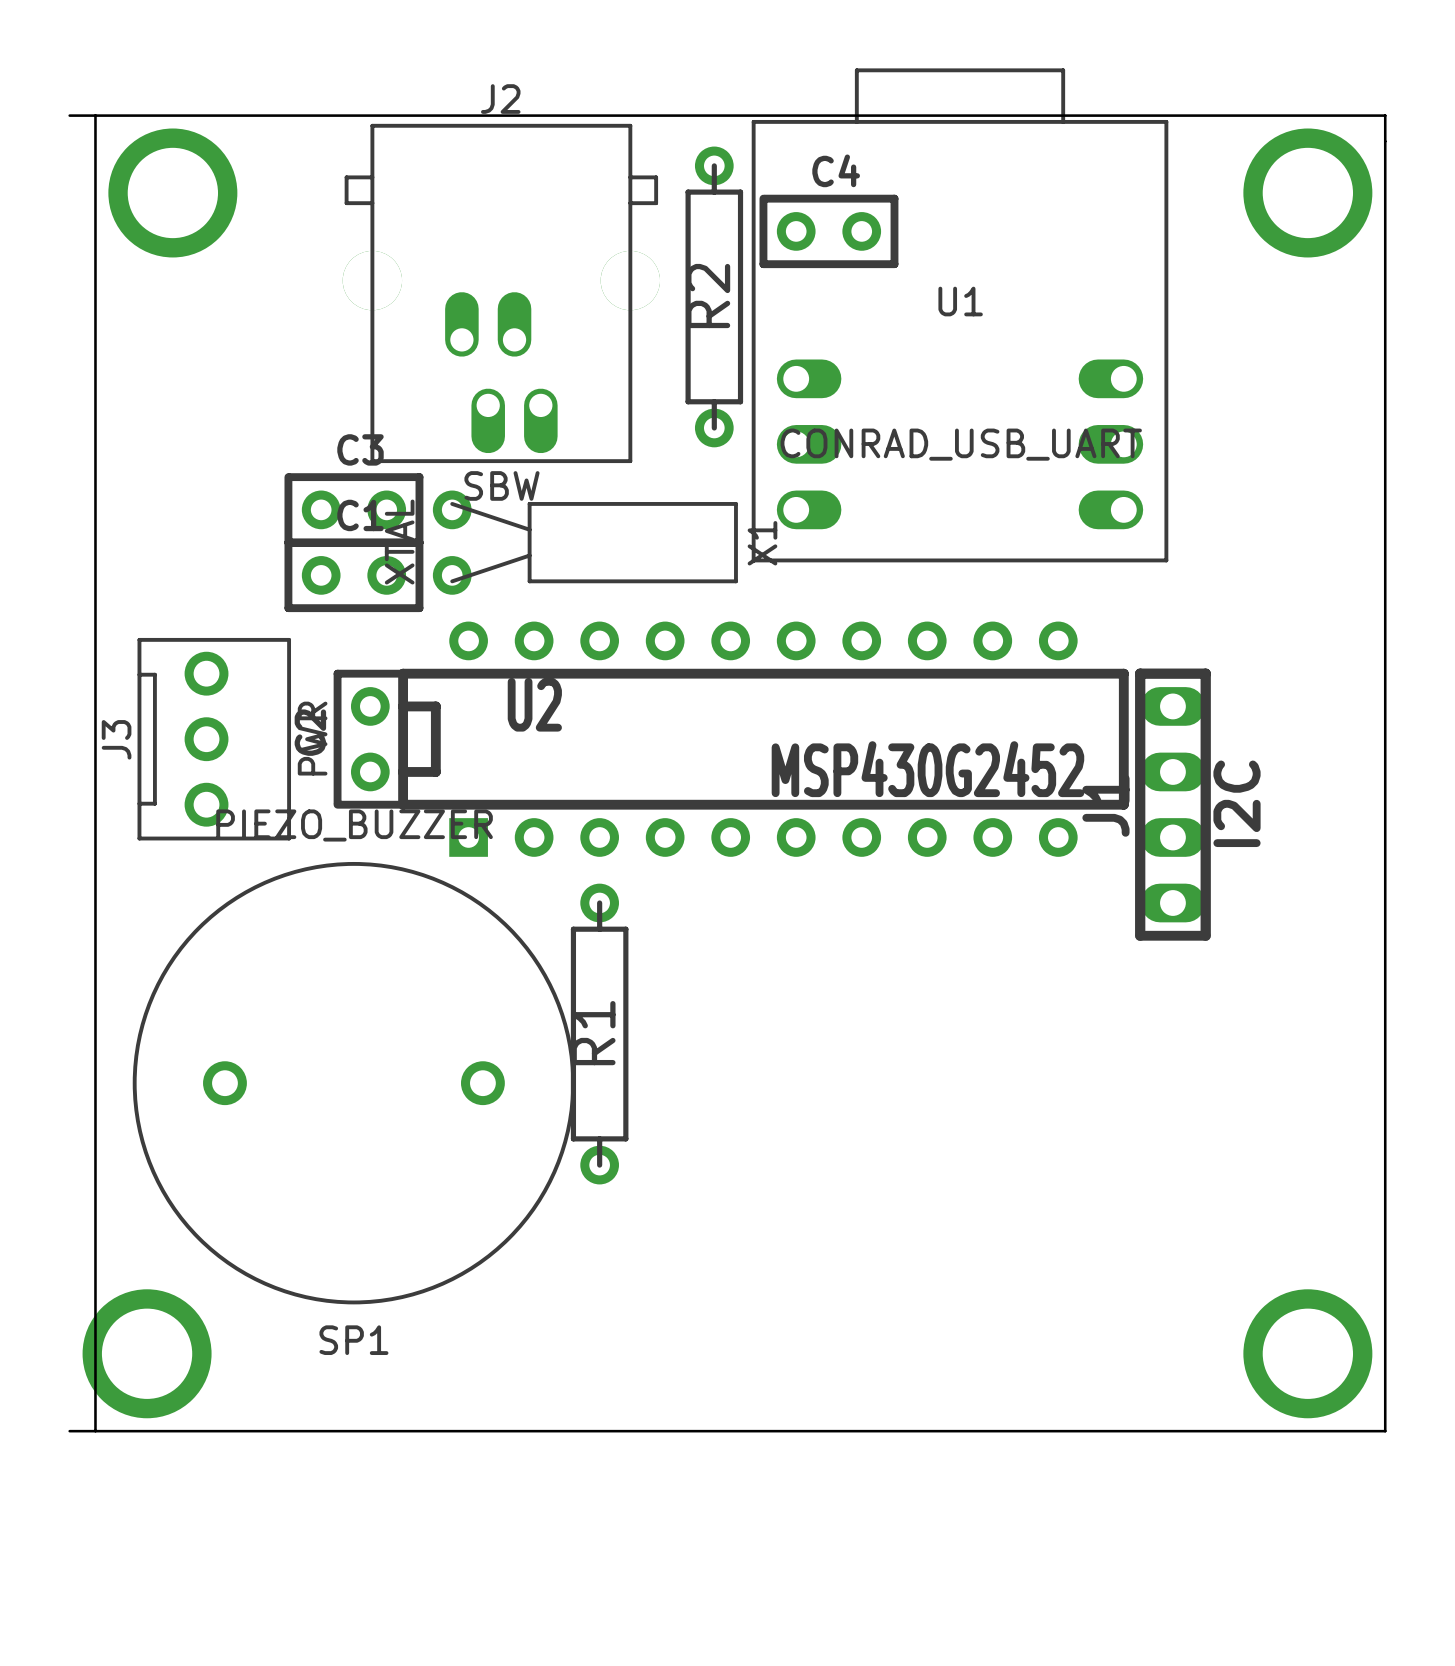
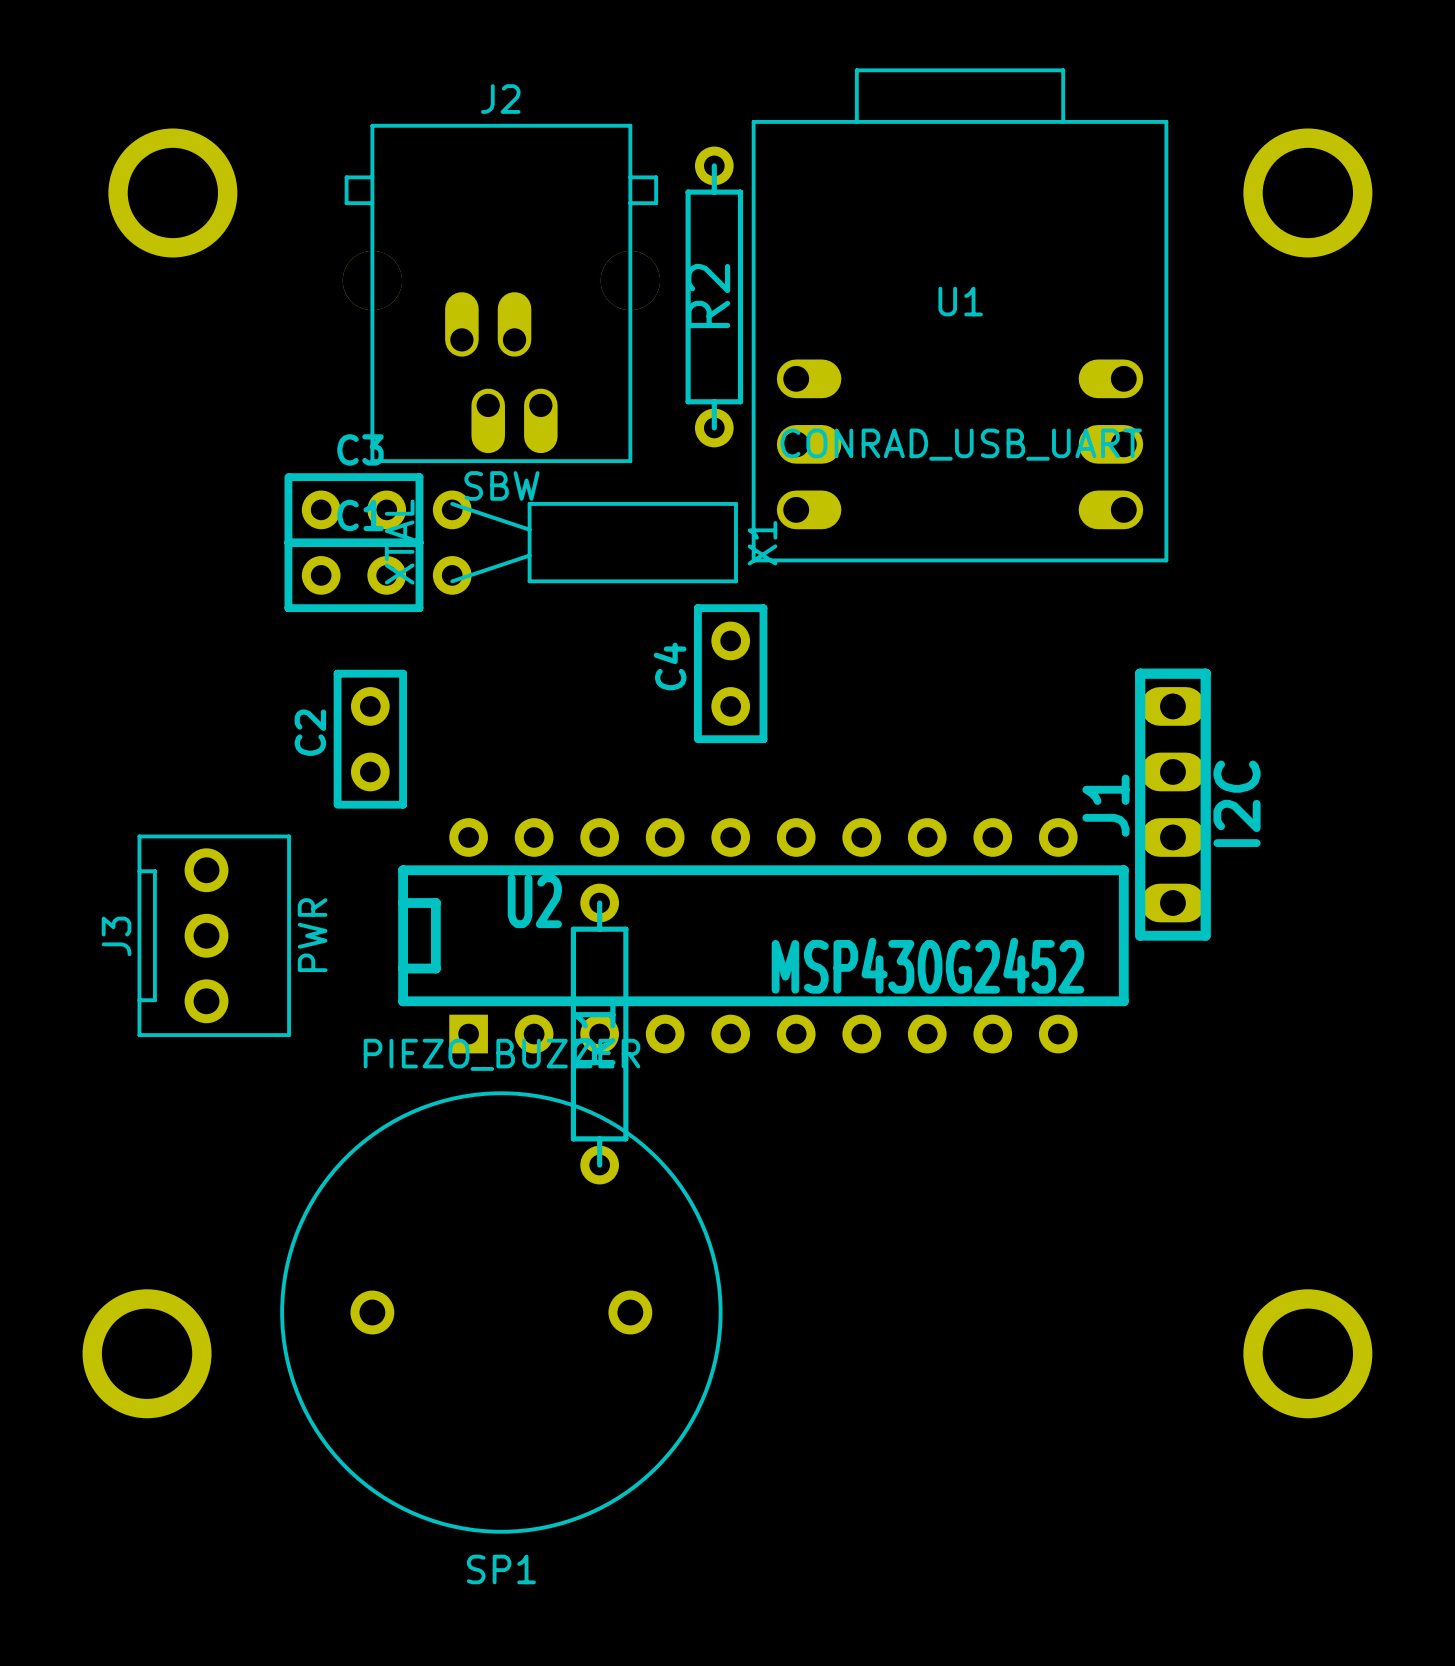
board edge: (69, 115) (1385, 115) (1385, 1431) (69, 1431) -> none
board edge: (95, 115) (95, 1431) -> none
C4 rotation: 0° (828, 231) -> 90° counterclockwise (730, 673)
C4 position: (828, 231) -> (730, 673)
J3 position: (214, 739) -> (214, 935)
U2 position: (763, 739) -> (763, 935)
SP1 position: (353, 1083) -> (501, 1312)

